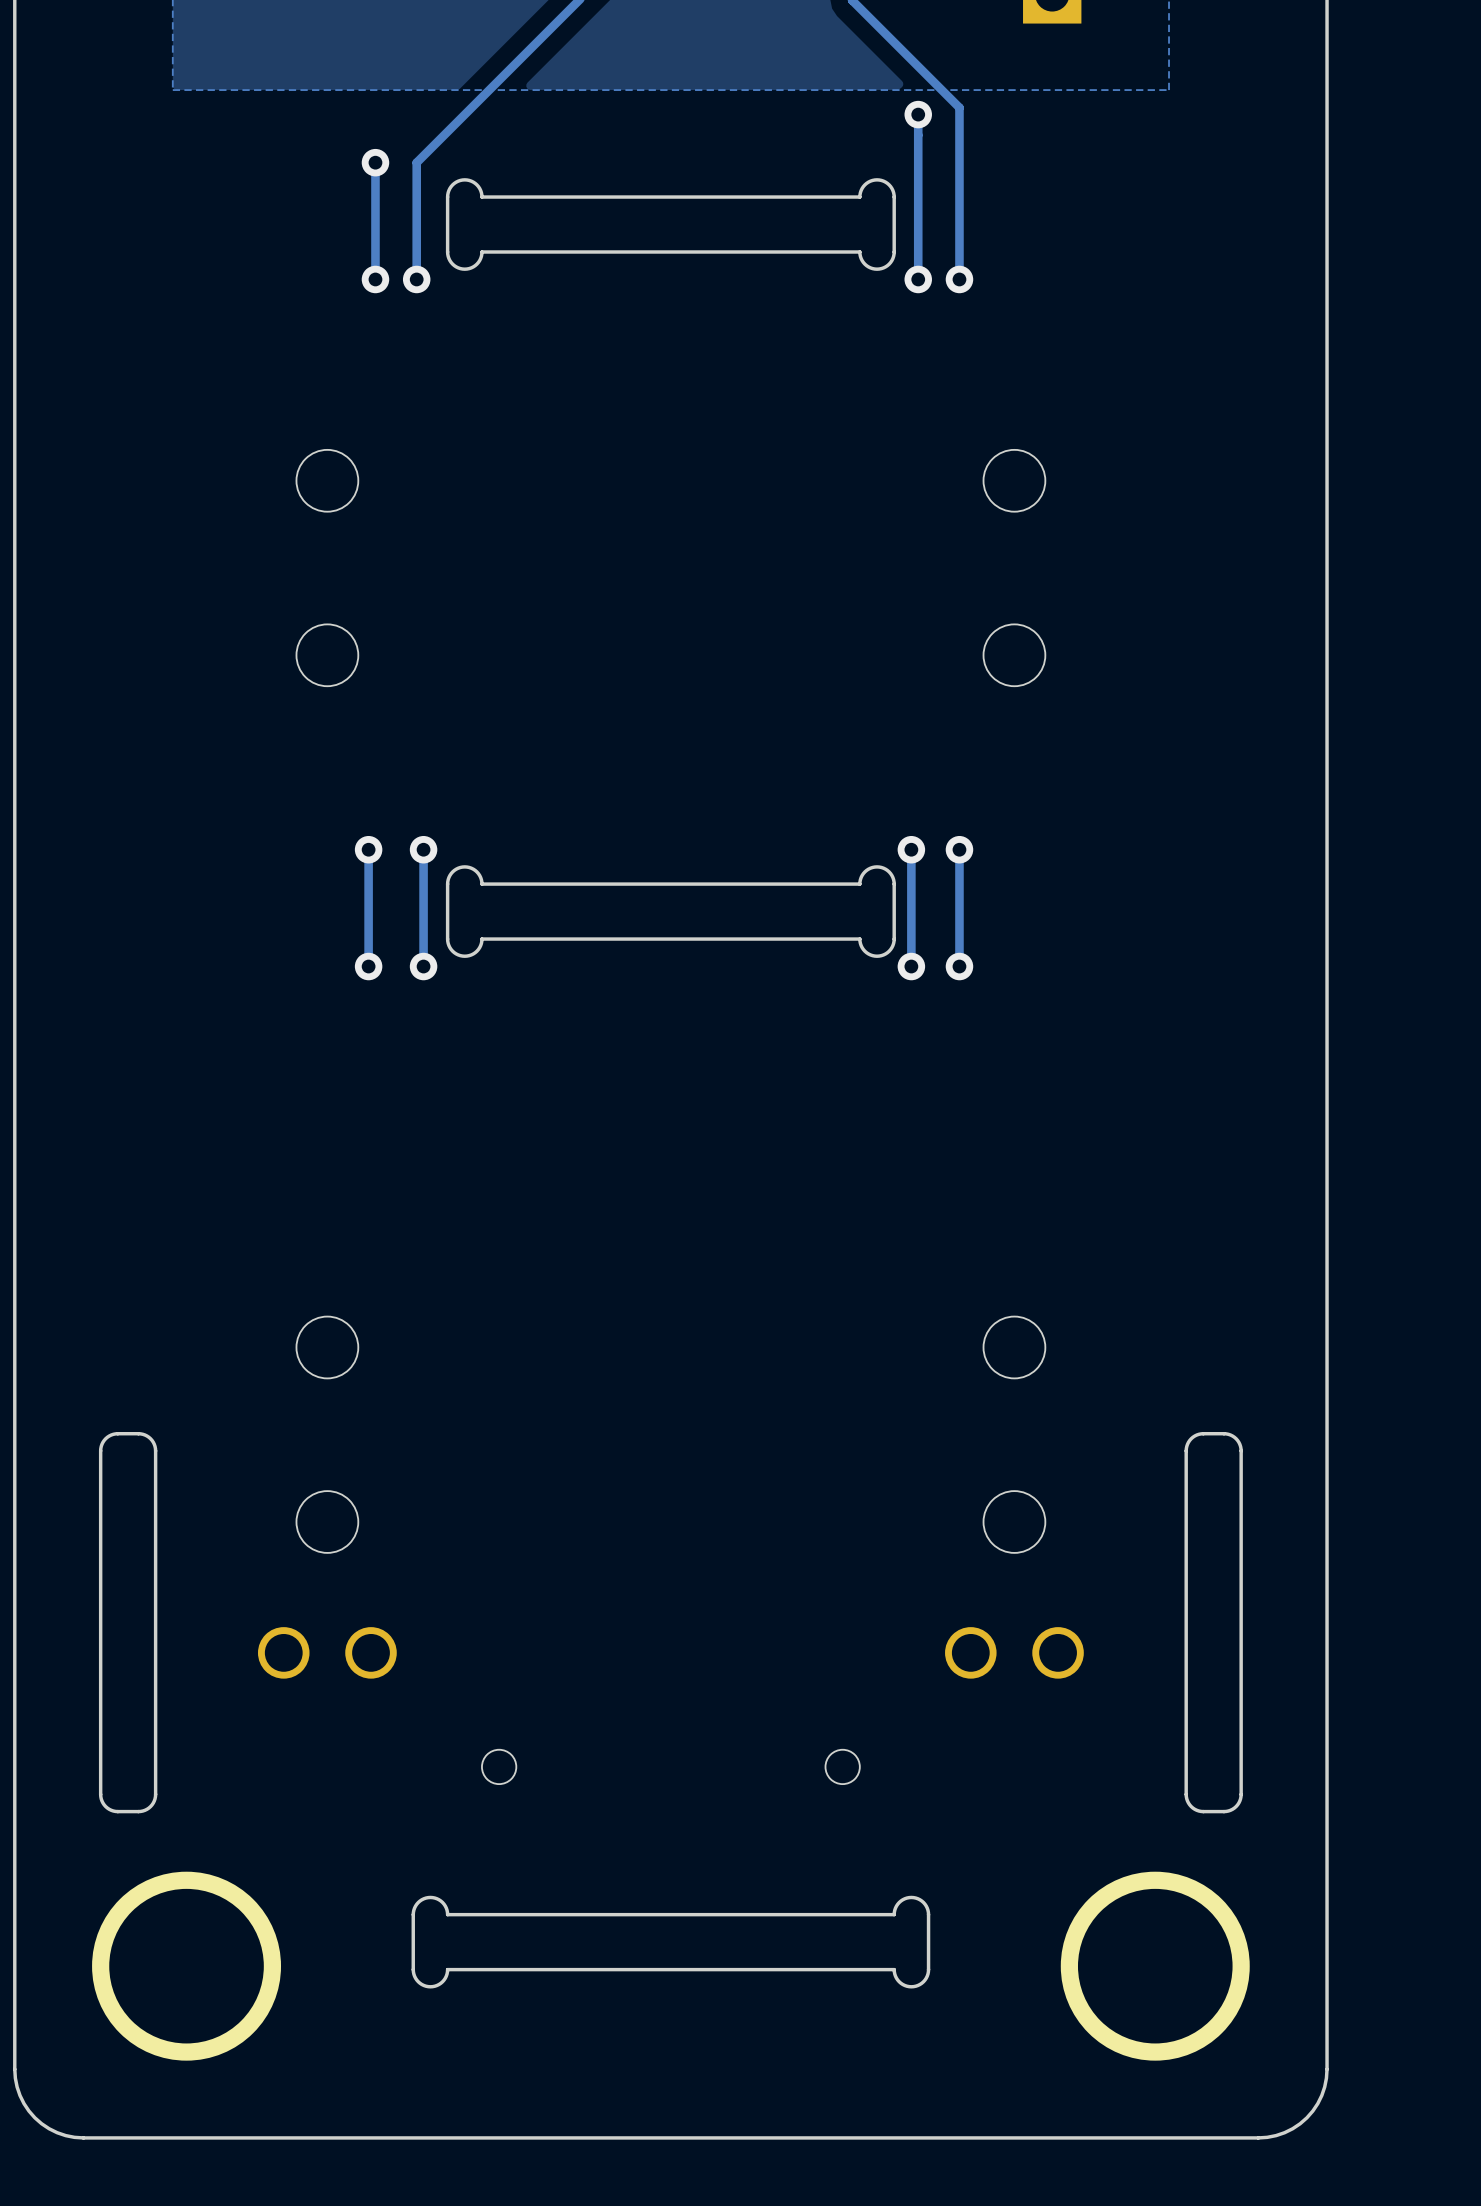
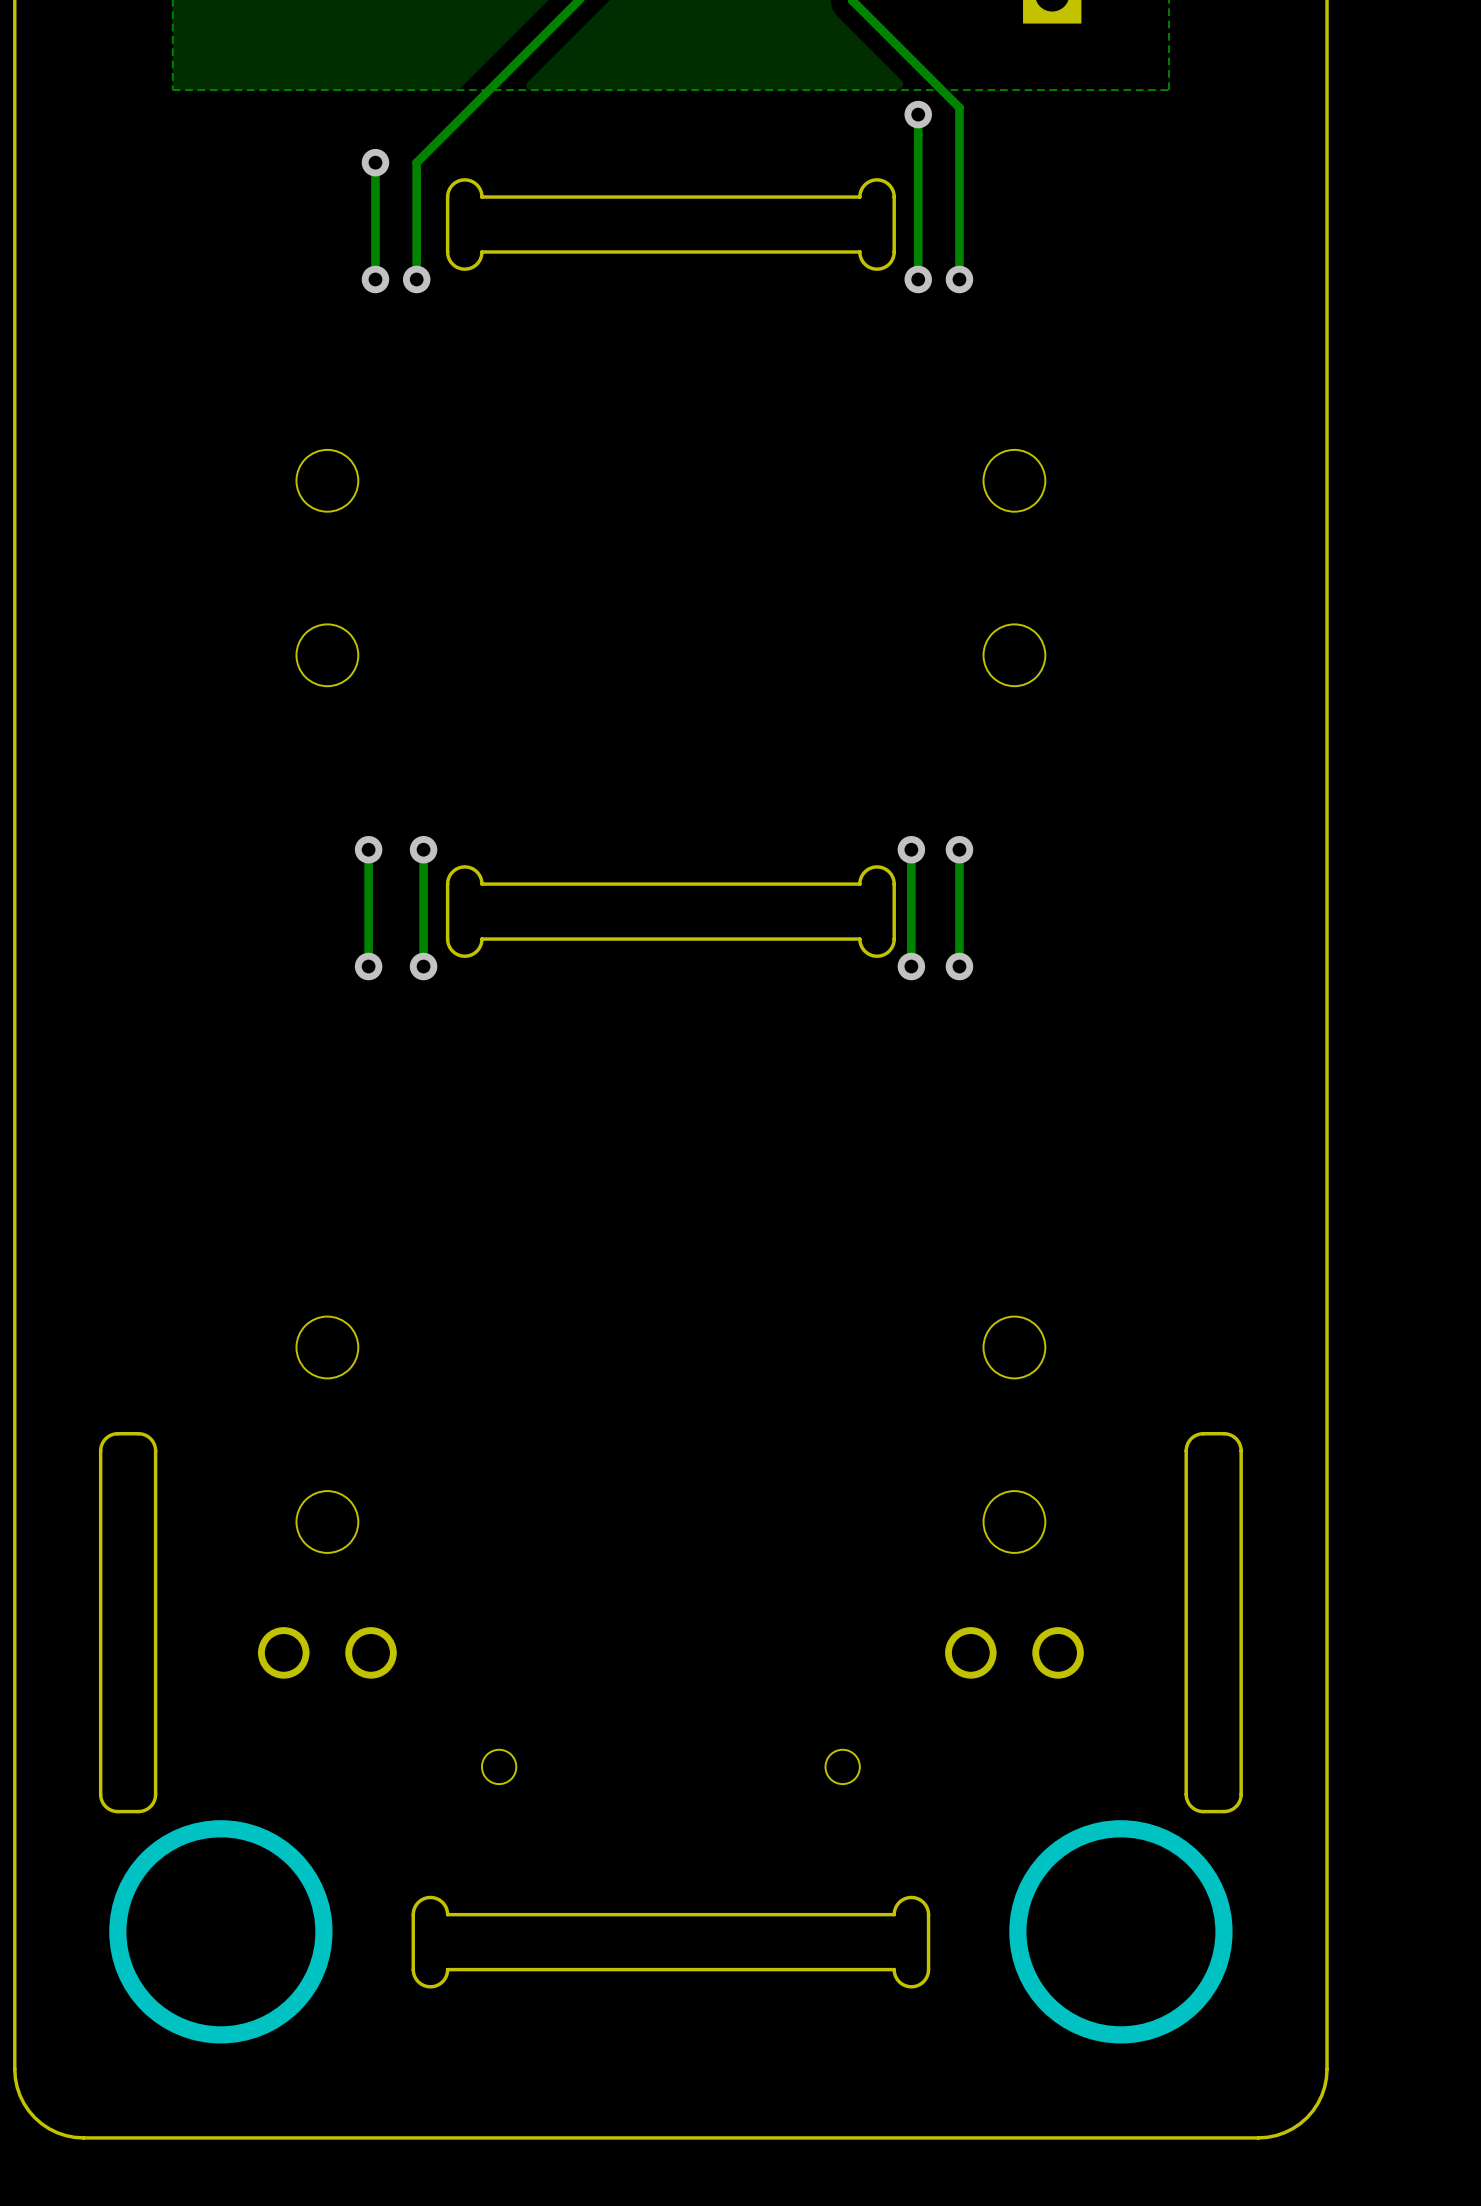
drawing: none -> [109, 1820, 333, 2044]
drawing: none -> [1009, 1820, 1233, 2044]
drawing: [92, 1871, 282, 2061] -> none
drawing: [1060, 1871, 1250, 2061] -> none

